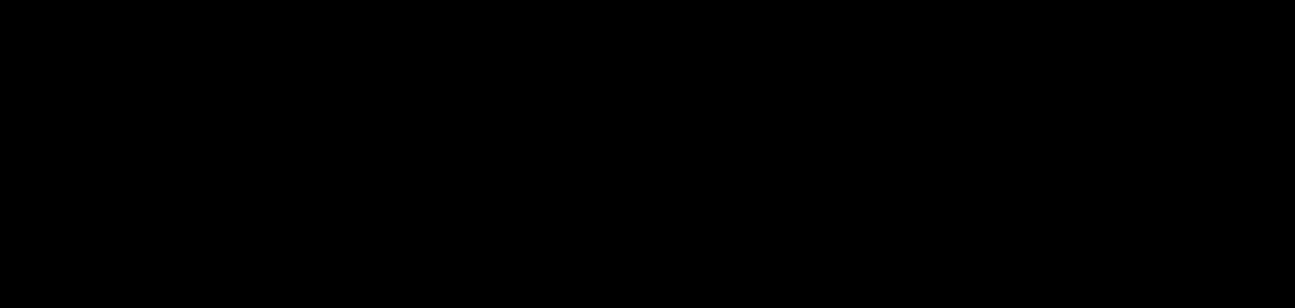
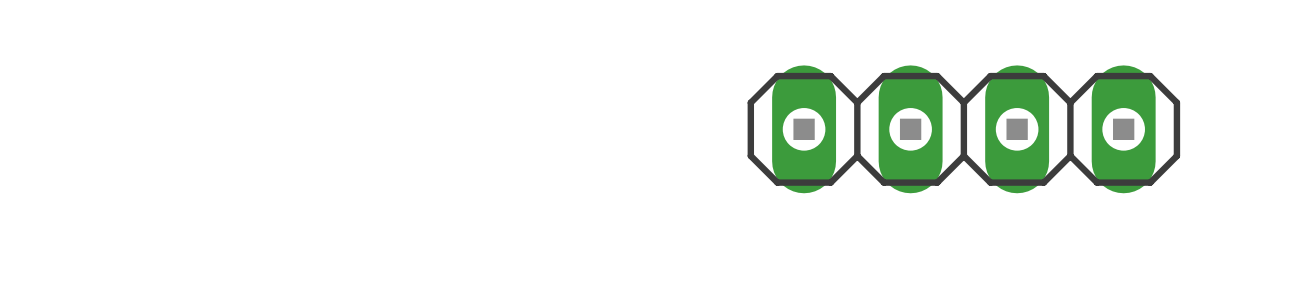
part: none -> (963, 129)

